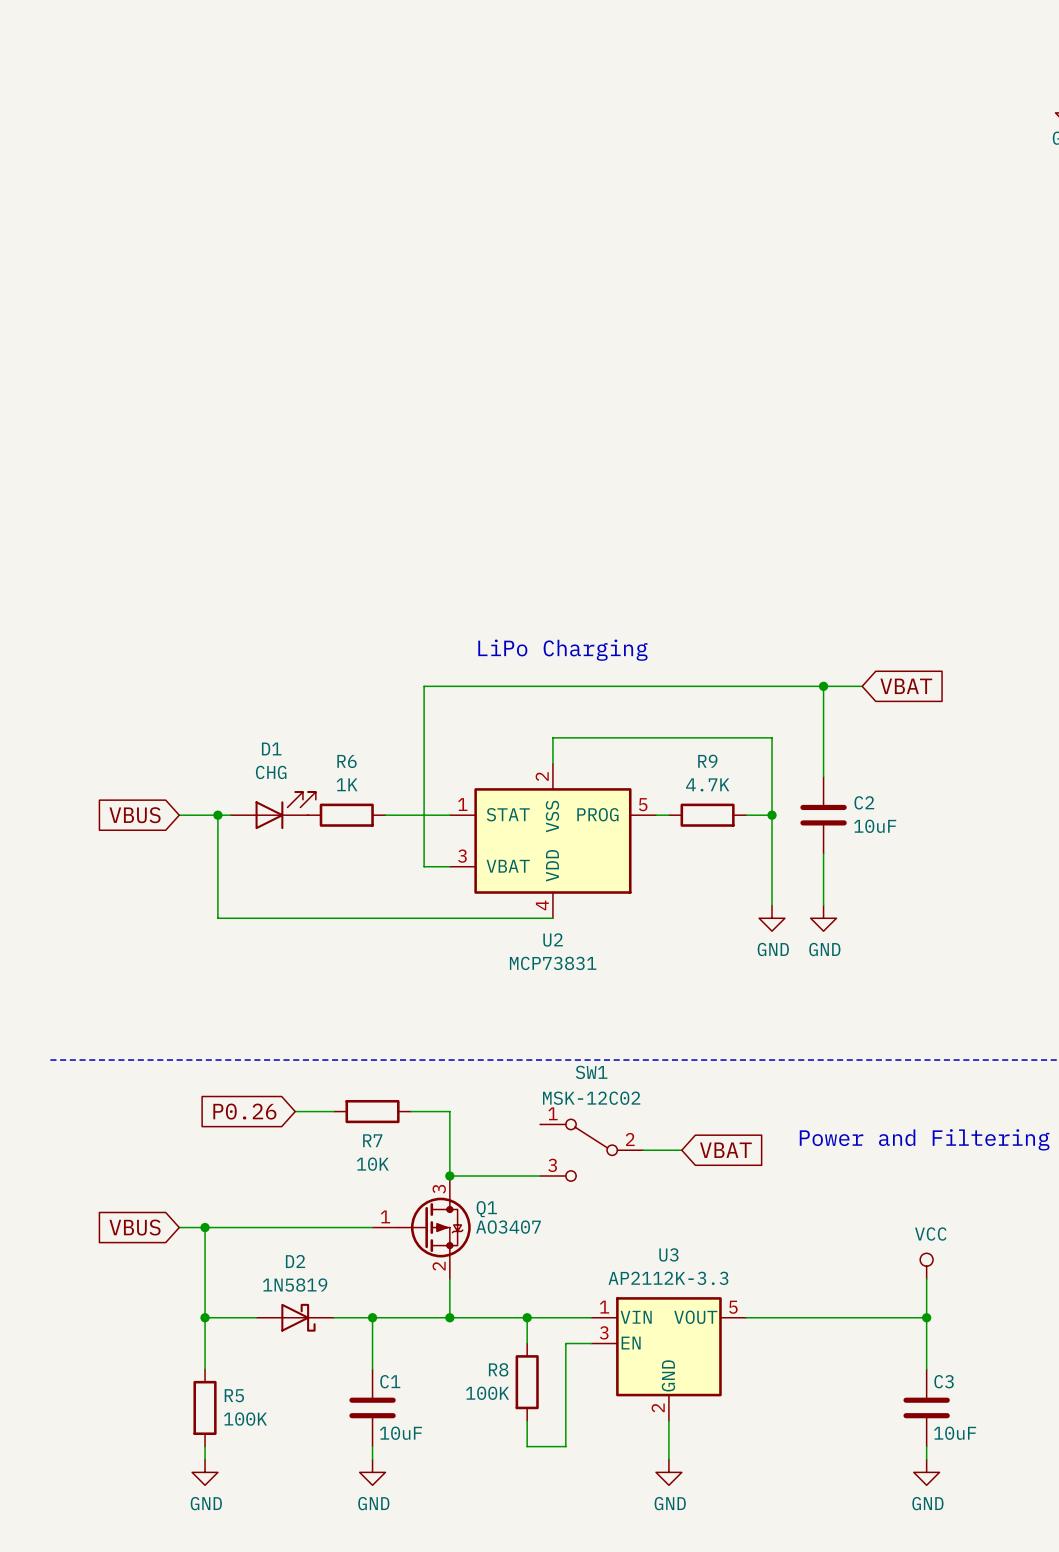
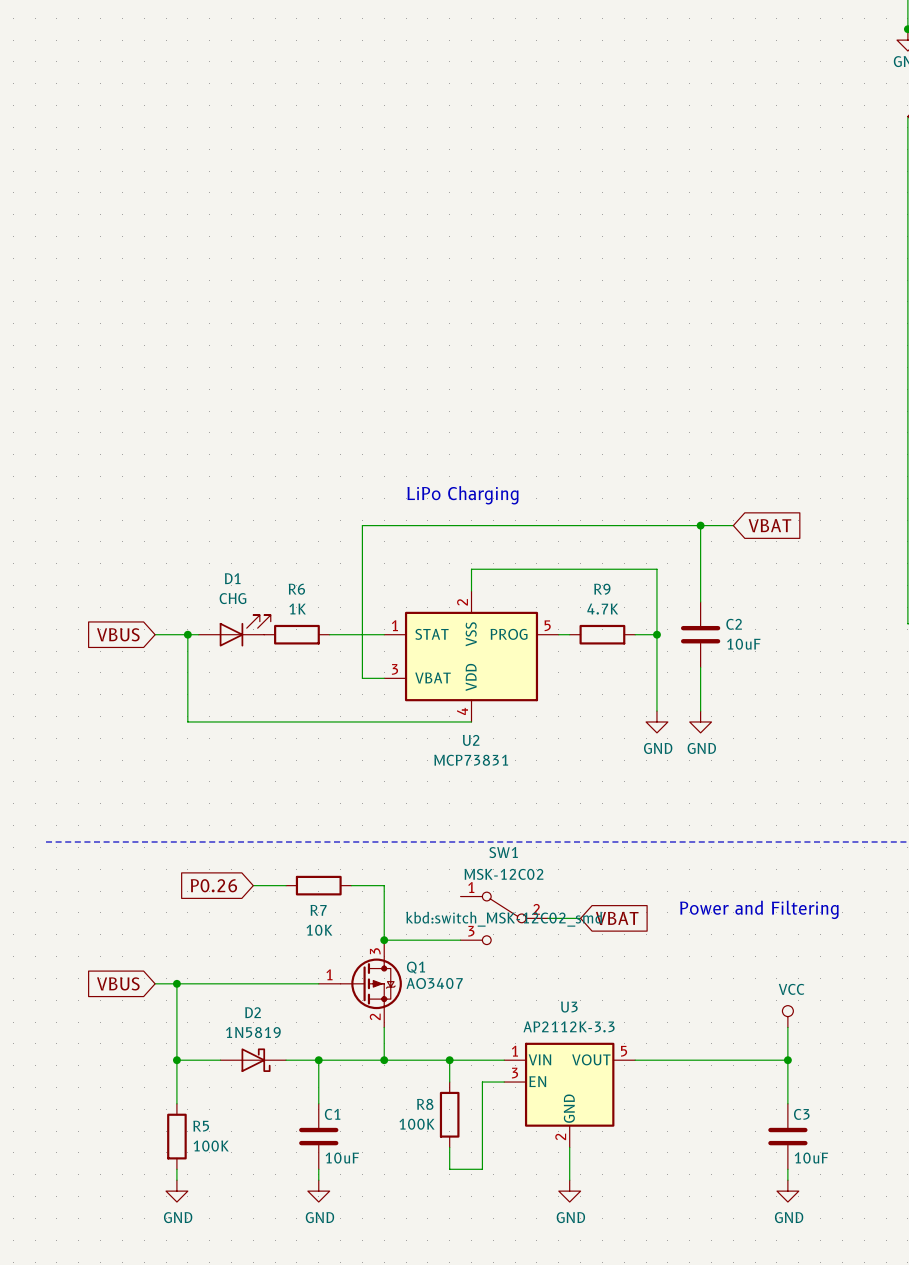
SW1 text: none -> kbd:switch_MSK-12C02_smd (504, 919)

